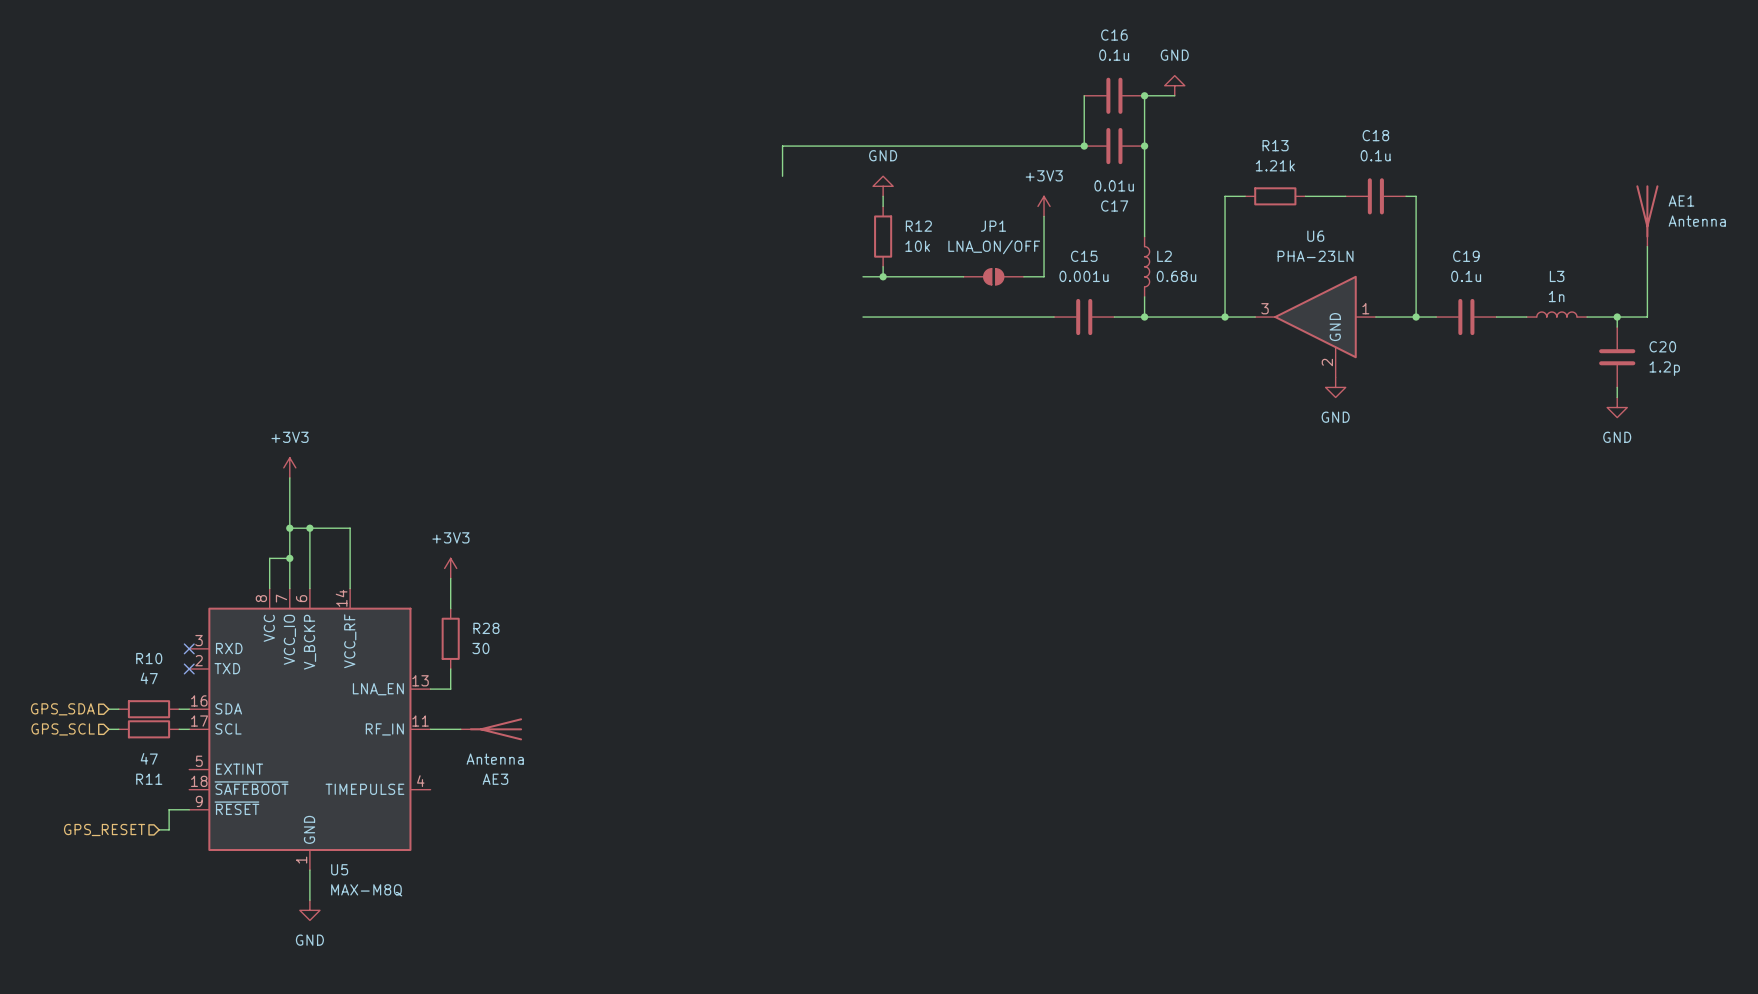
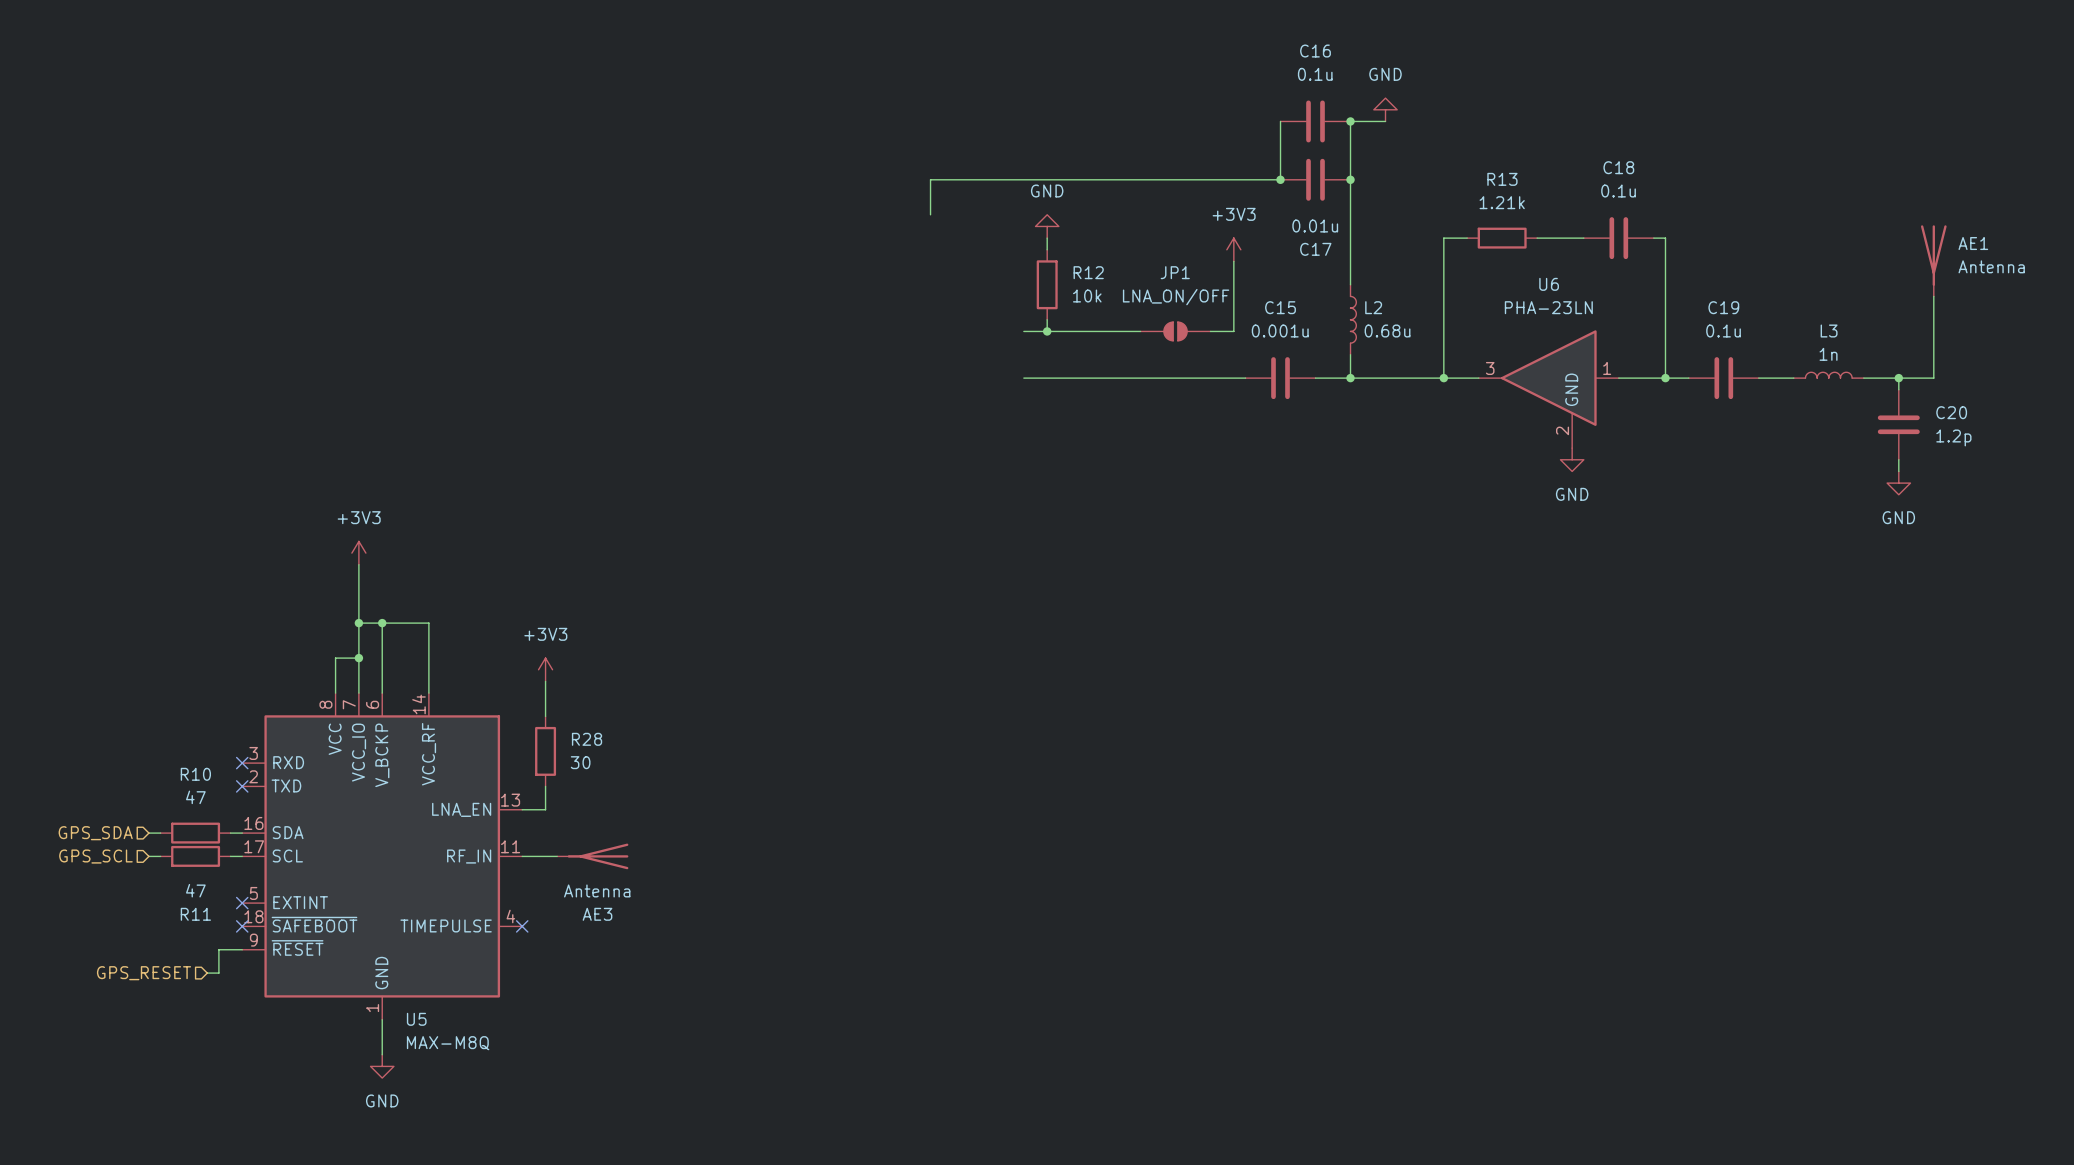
no-connect mark: none -> (242, 903)
no-connect mark: none -> (242, 926)
no-connect mark: none -> (522, 926)

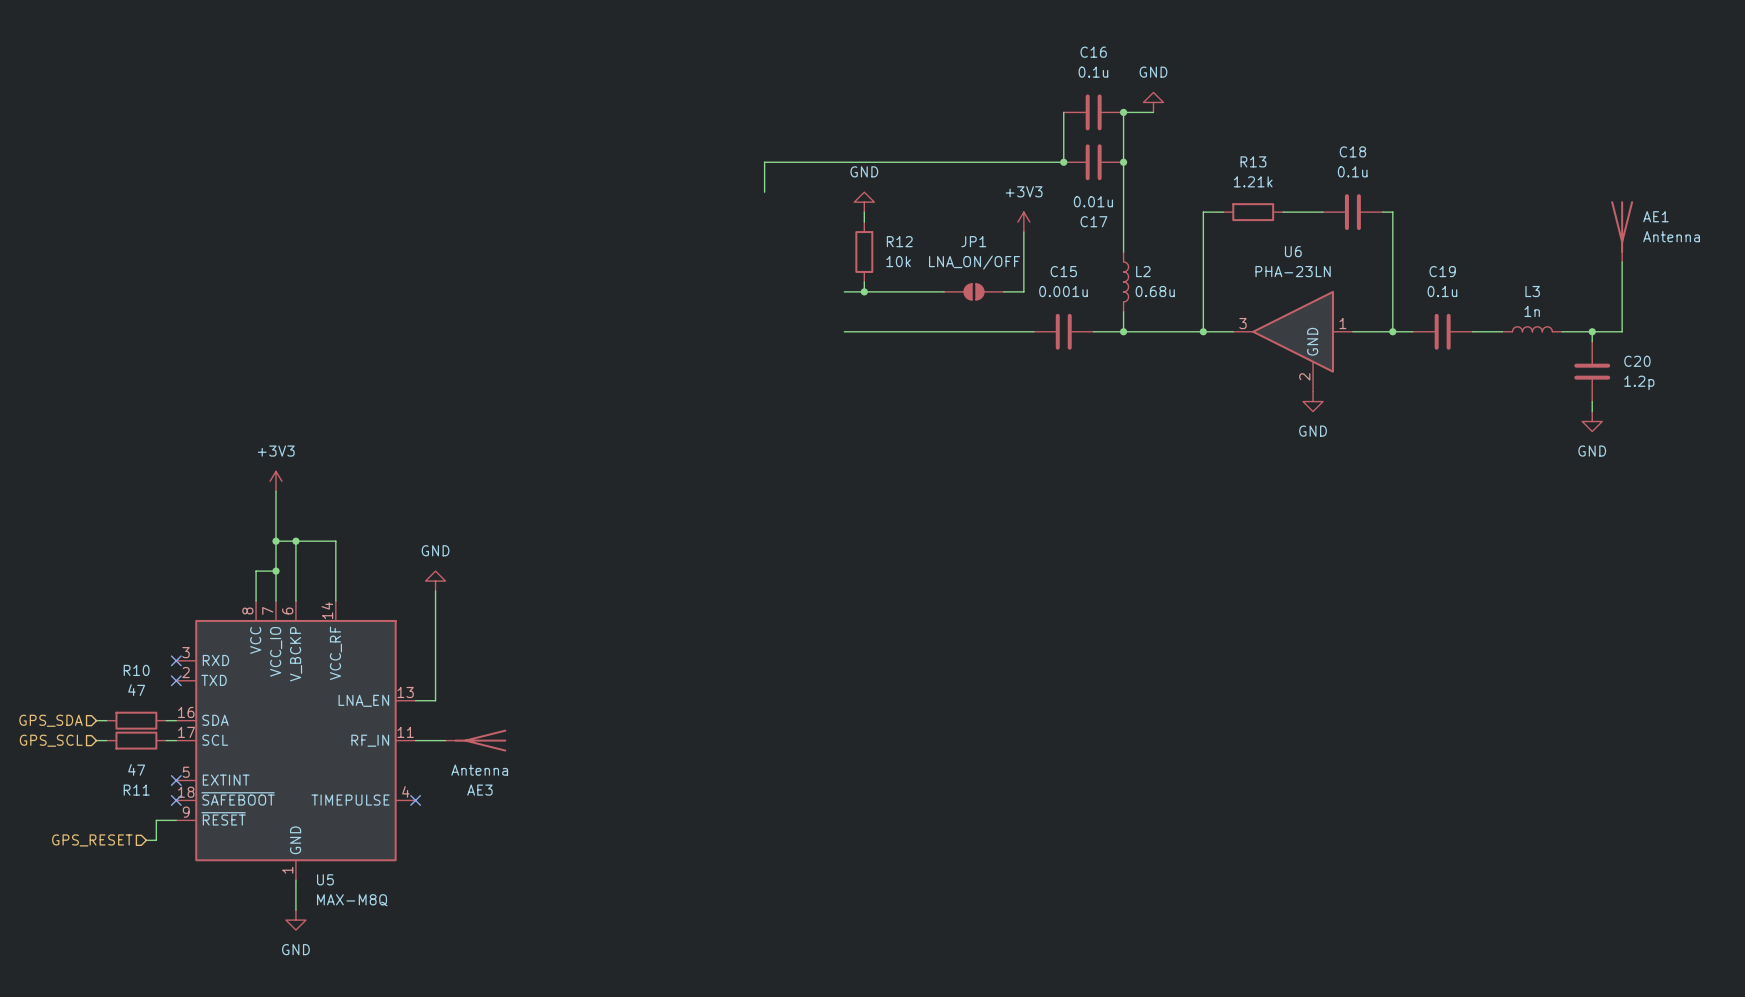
power symbol: +3V3 (545, 669) -> GND (435, 581)
wire: none -> (435, 620) (435, 680)
R28: 30 (545, 751) -> none

